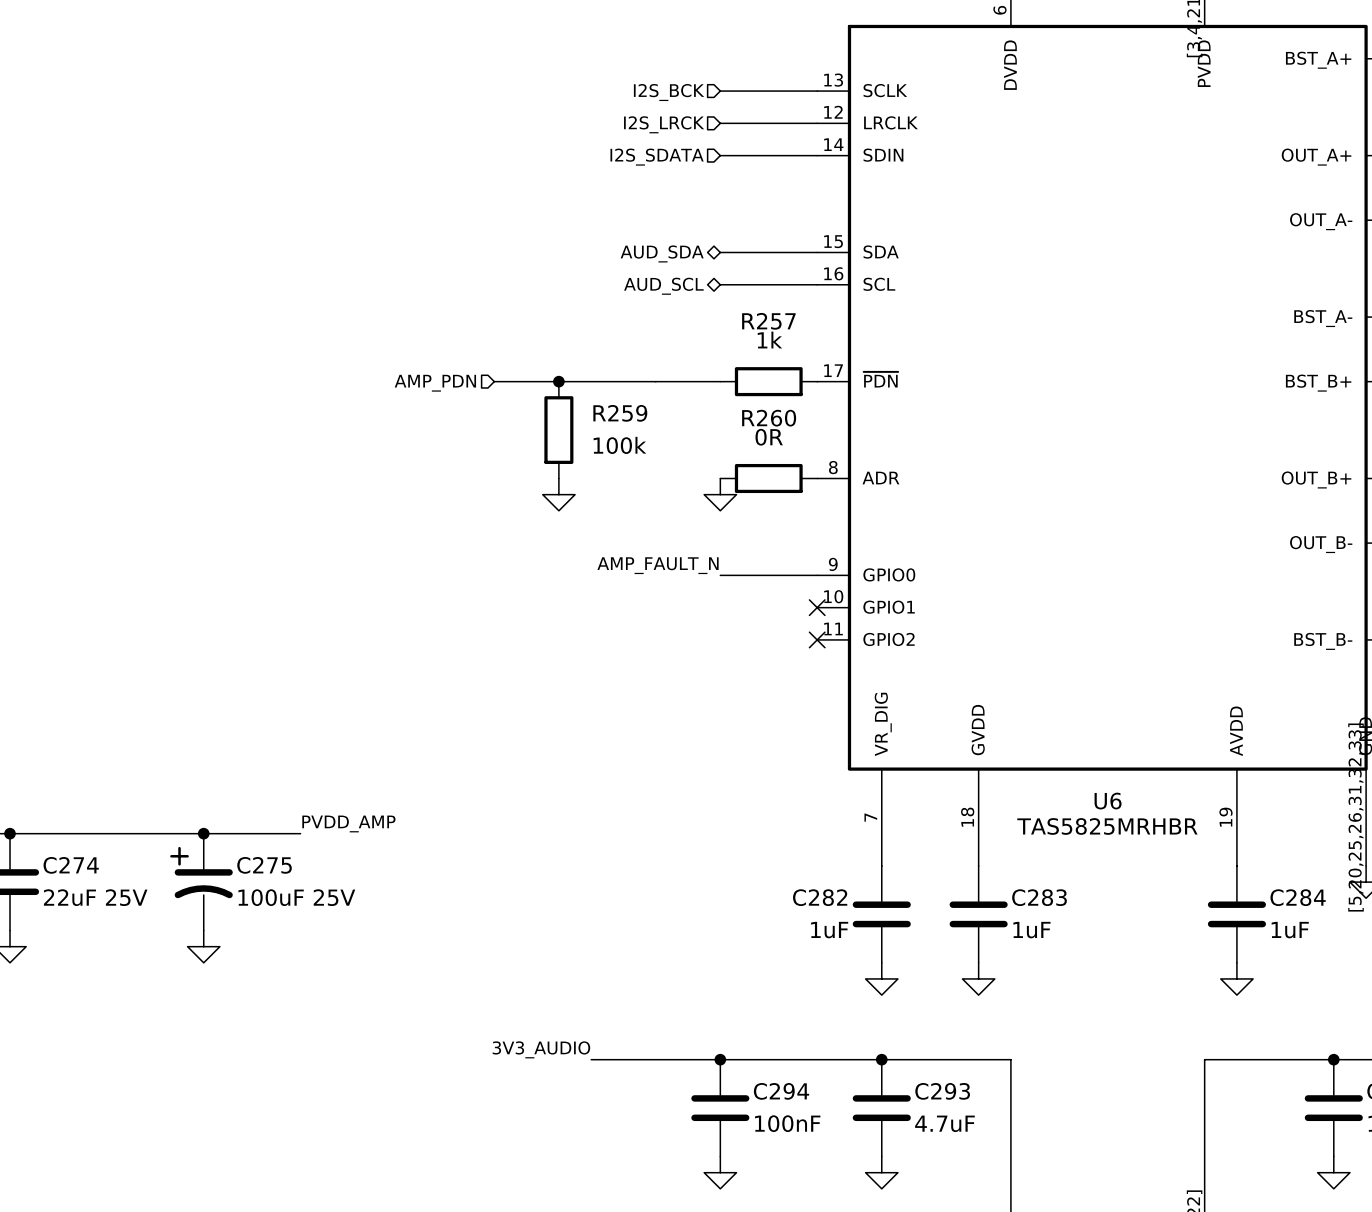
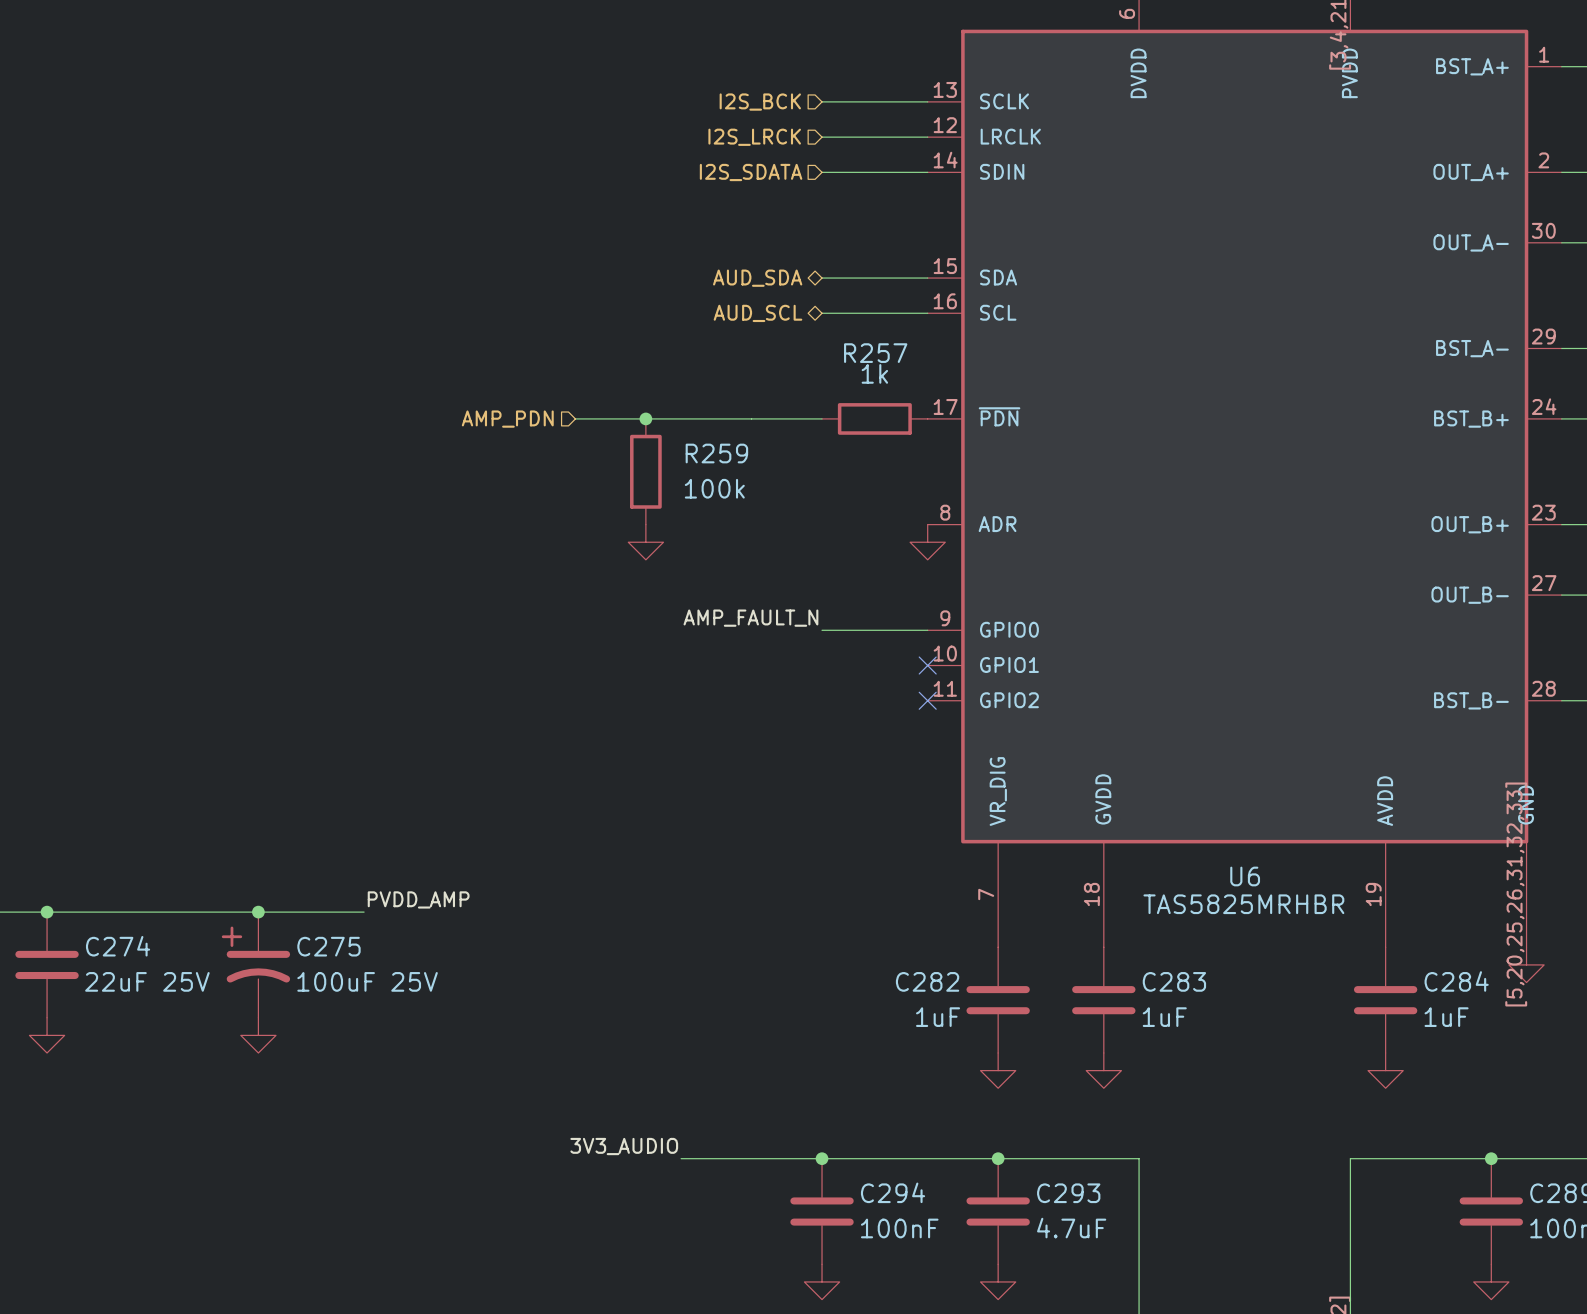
R260: 0R (768, 478) -> none
power symbol position: (720, 494) -> (927, 542)

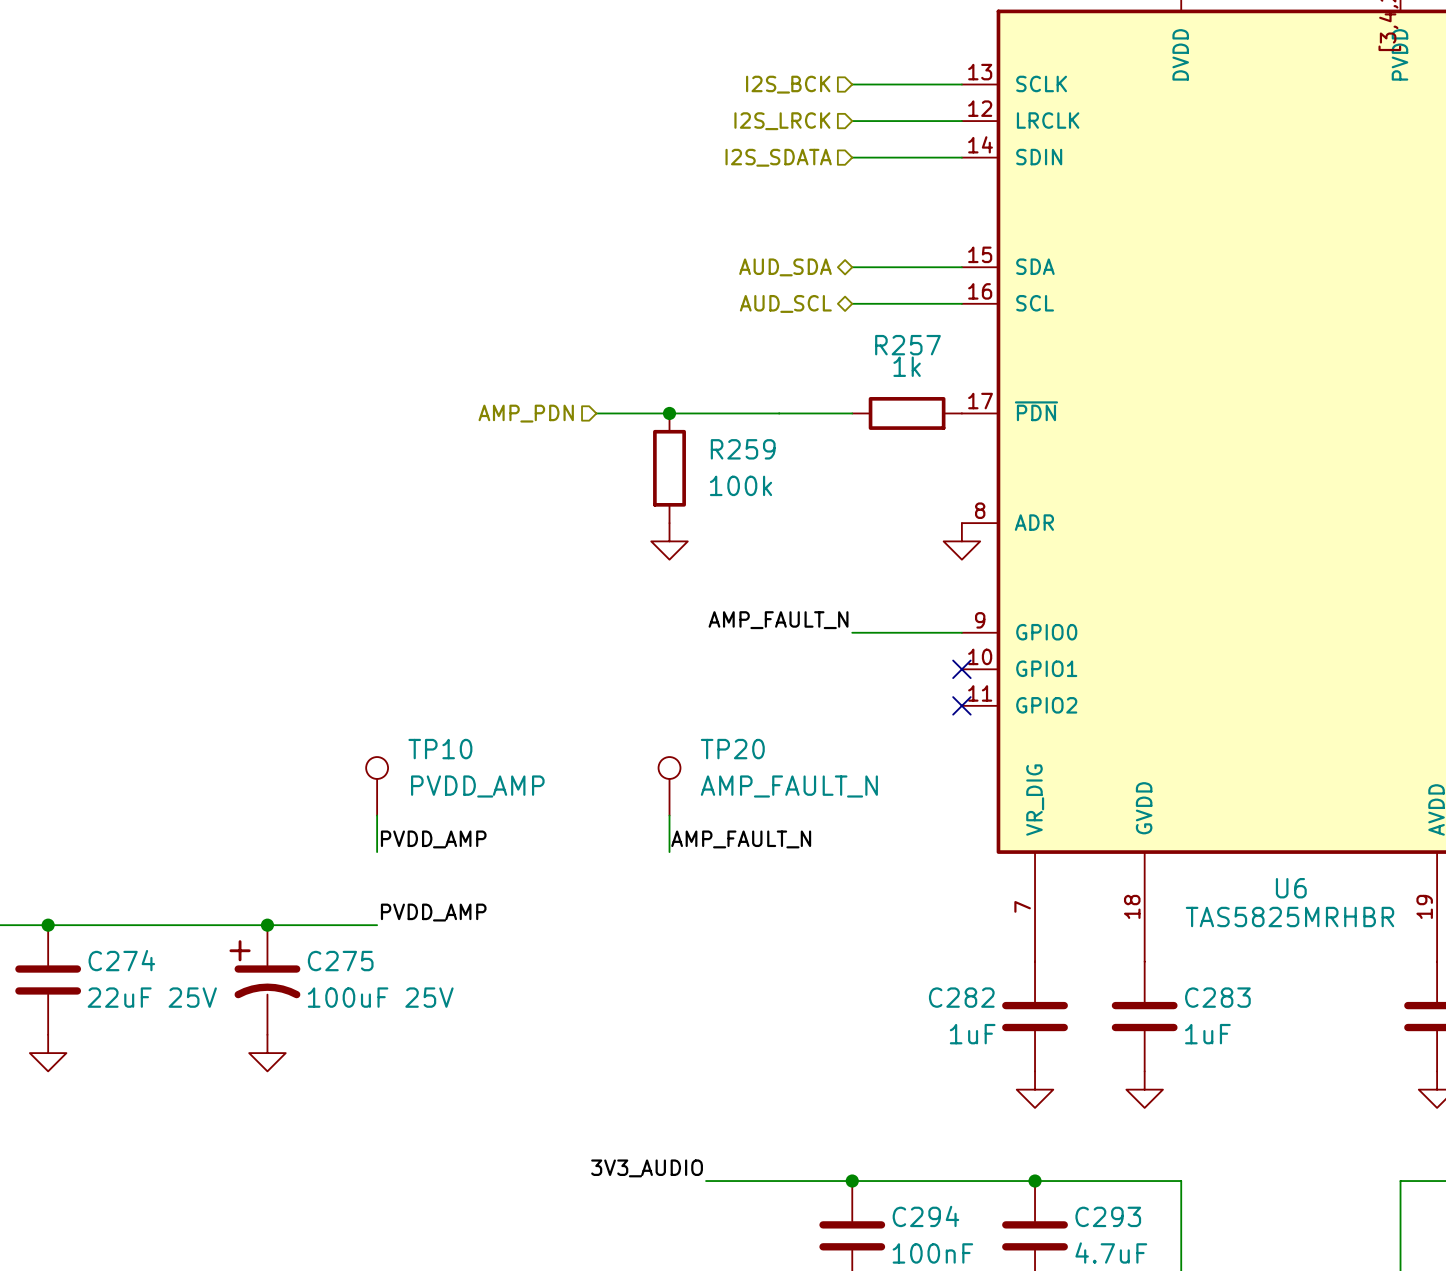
TP10: none -> PVDD_AMP (377, 786)
TP20: none -> AMP_FAULT_N (669, 786)
wire: none -> (377, 815) (377, 852)
wire: none -> (669, 815) (669, 852)
label: none -> PVDD_AMP (433, 839)
label: none -> AMP_FAULT_N (741, 839)

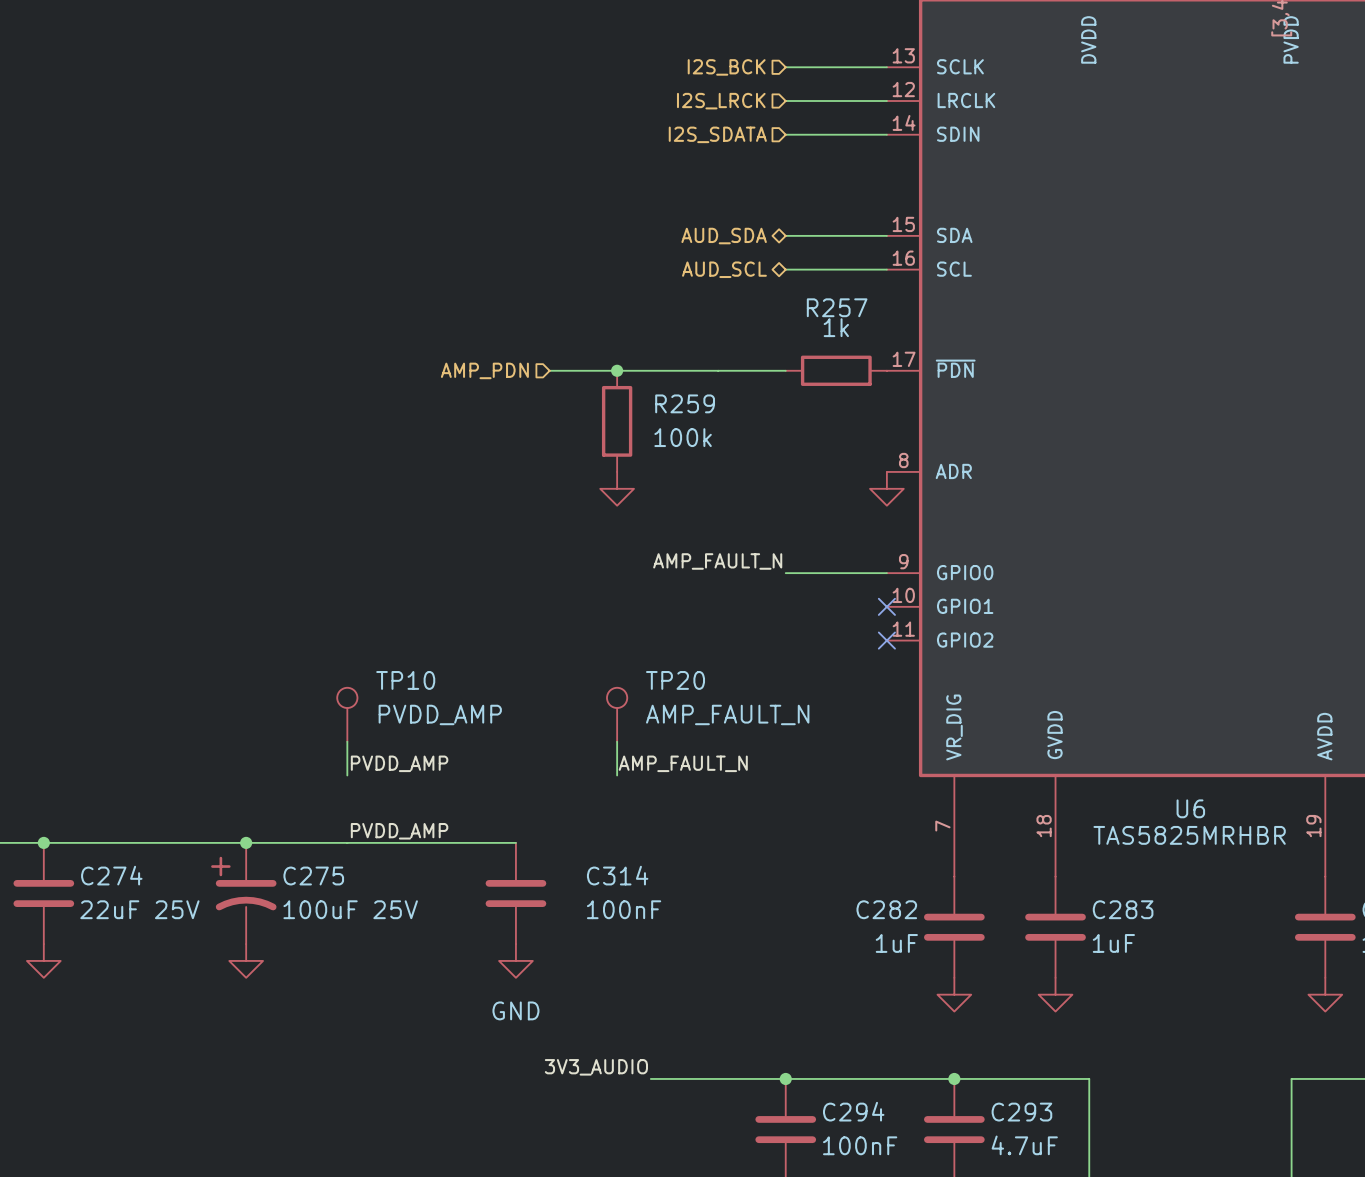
wire: none -> (347, 842) (515, 842)
C314: none -> 100nF (515, 893)
power symbol: none -> GND (515, 960)

